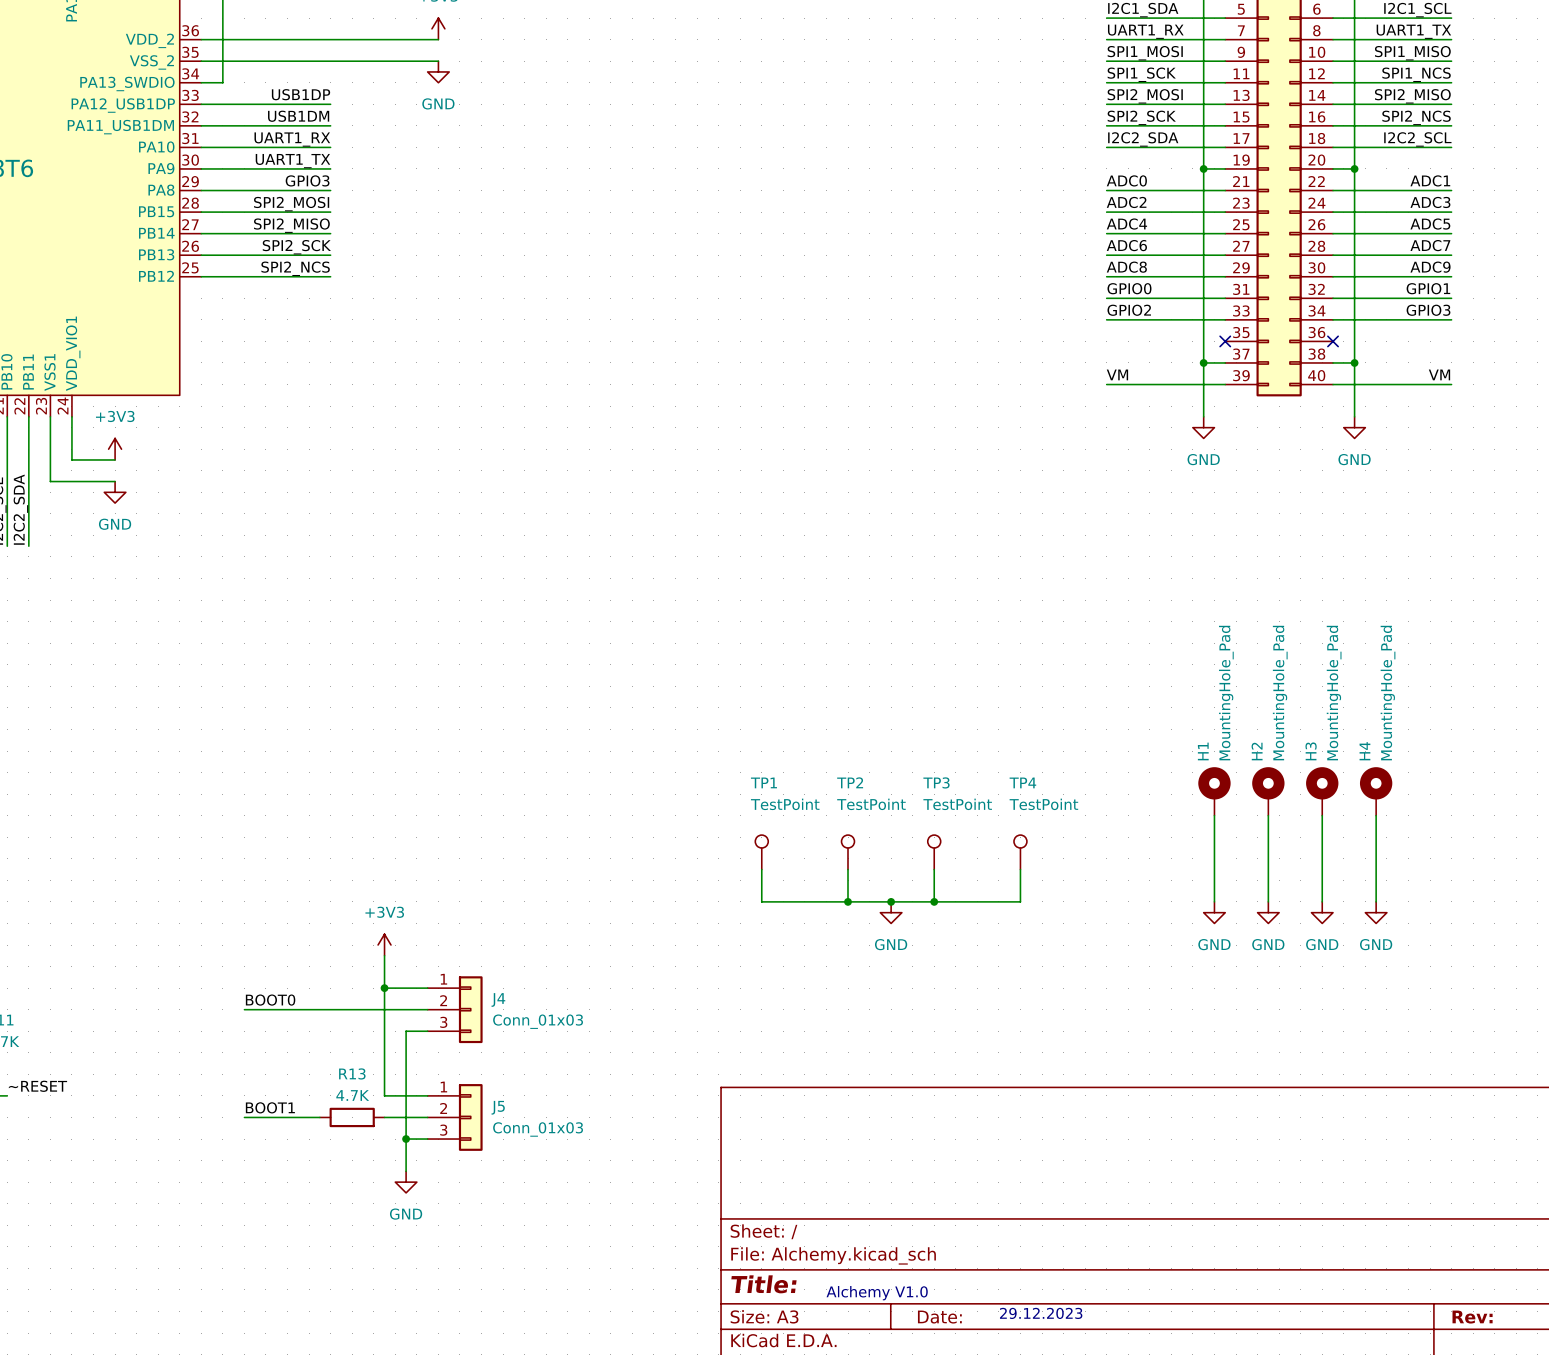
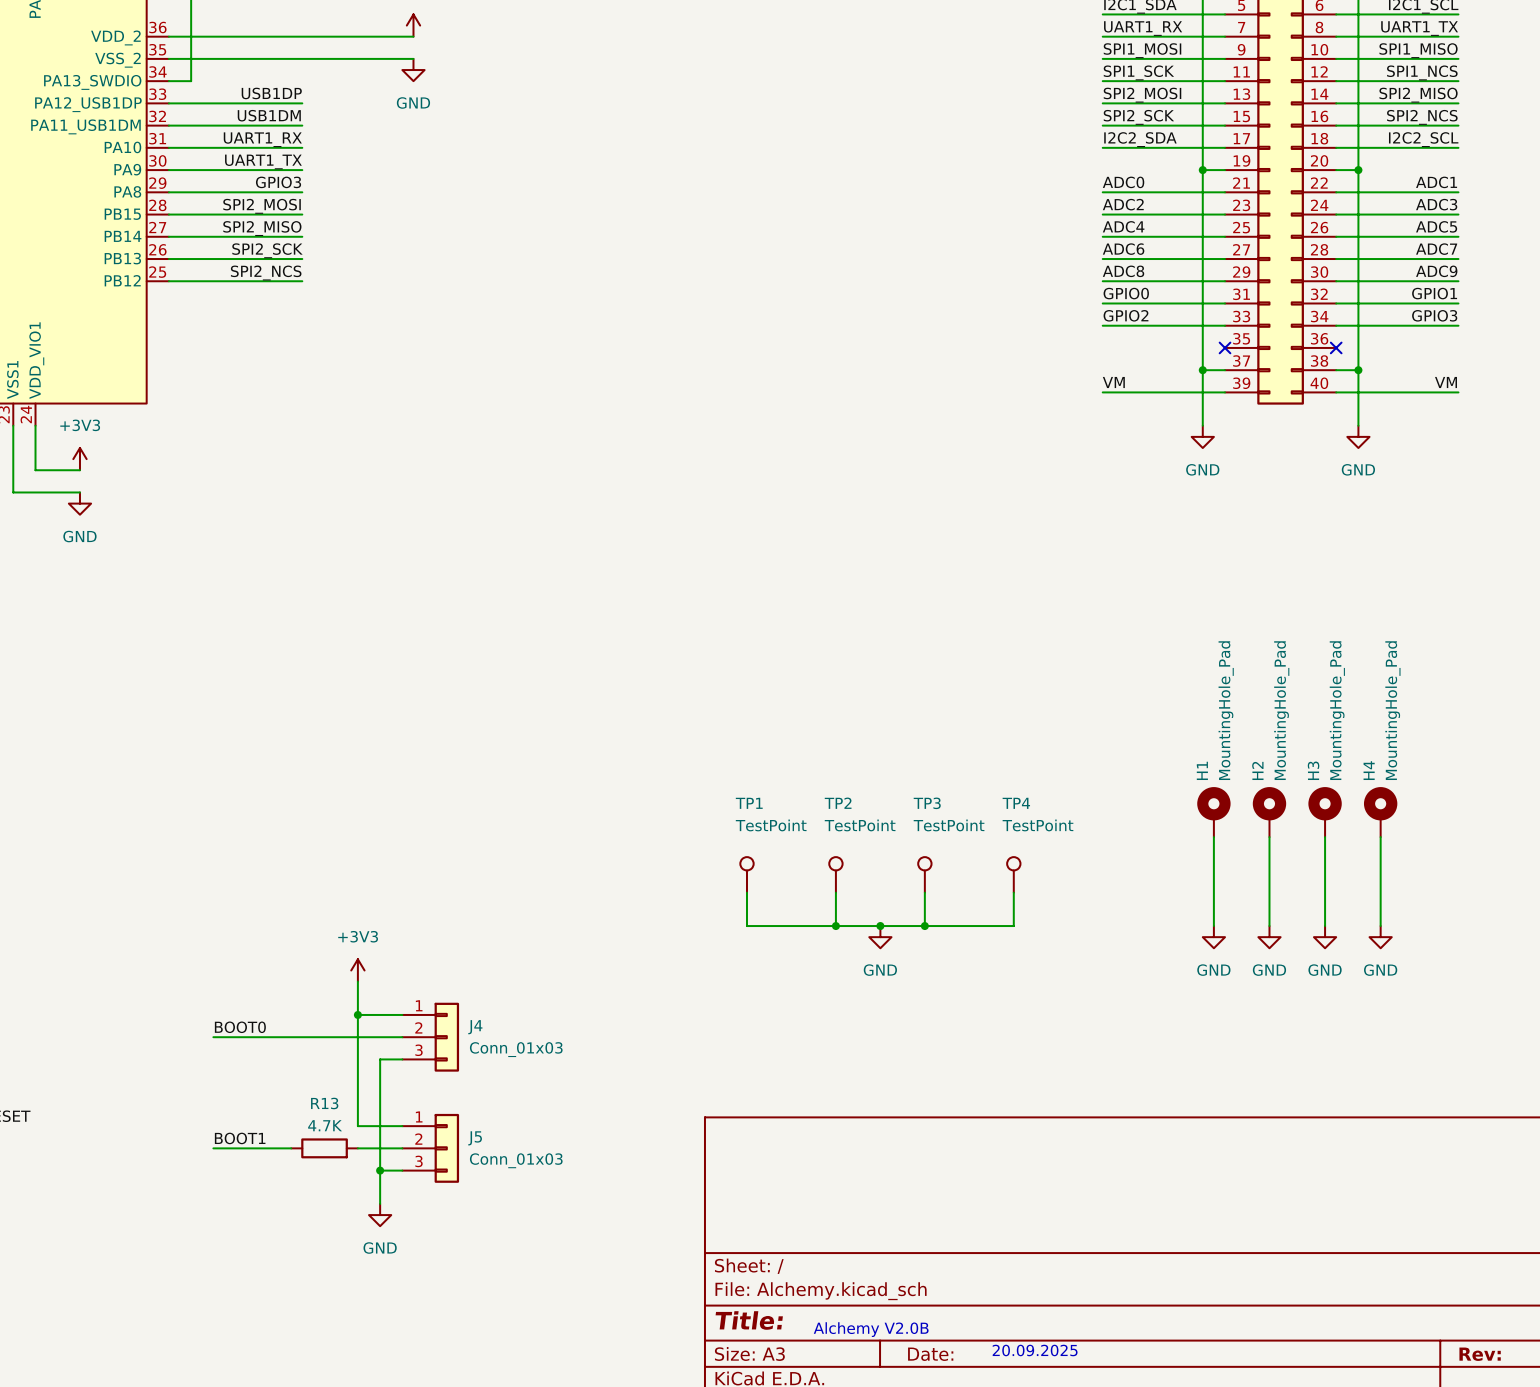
text: Alchemy V1.0 (877, 1293) -> Alchemy V2.0B (871, 1329)
text: 29.12.2023 (1041, 1313) -> 20.09.2025 (1035, 1350)

